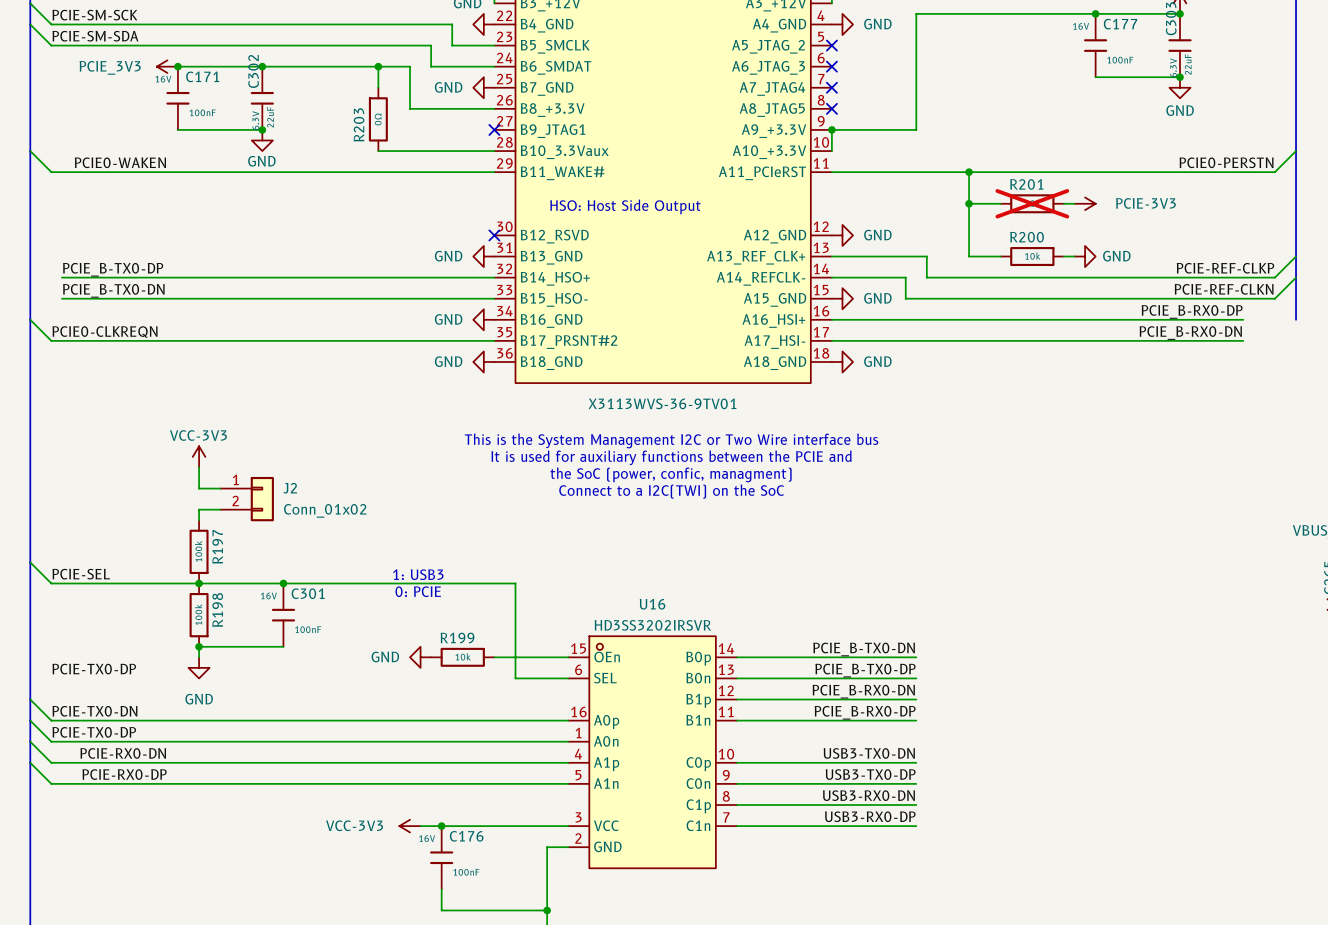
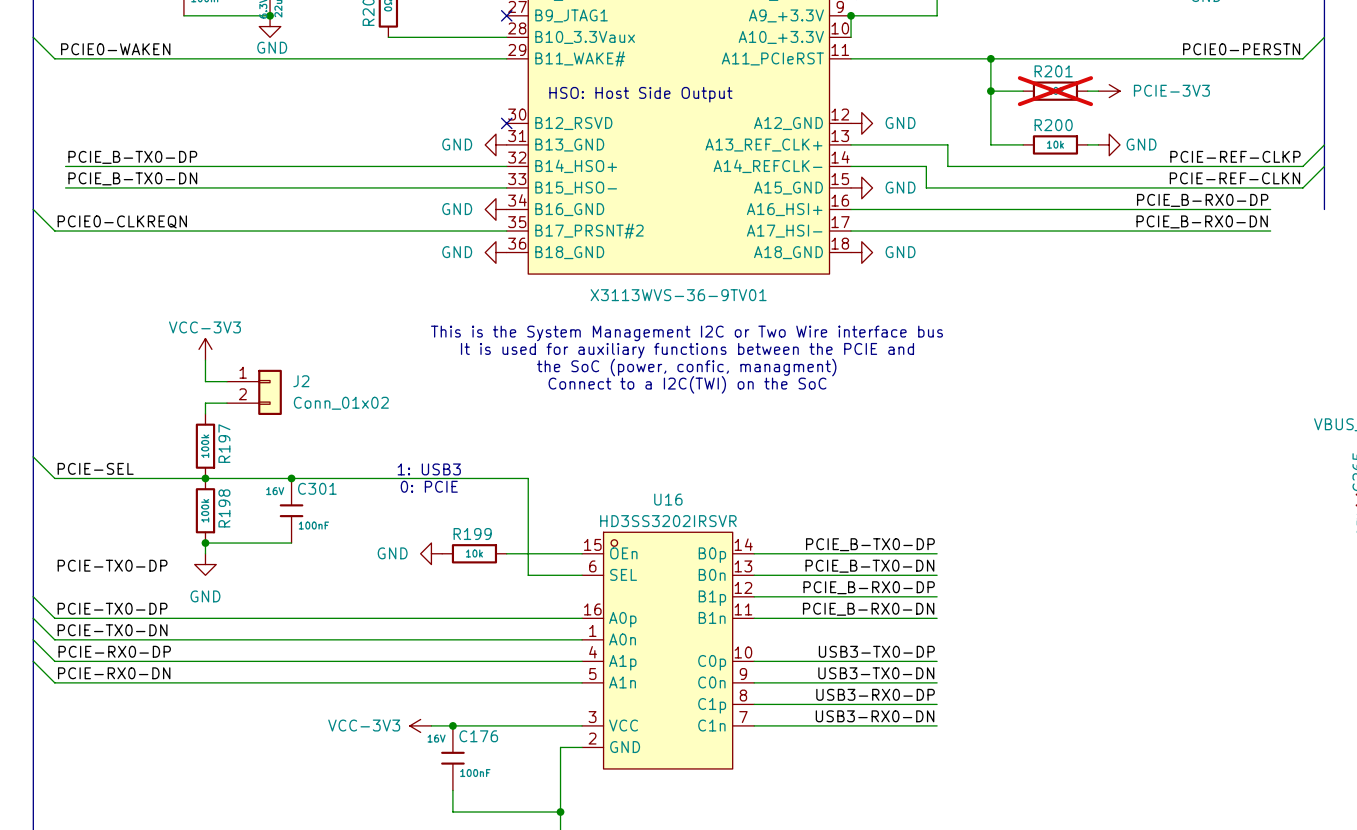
label: PCIE_B-TX0-DN (864, 649) -> PCIE_B-TX0-DP (870, 544)
label: PCIE_B-TX0-DP (865, 670) -> PCIE_B-TX0-DN (869, 566)
label: PCIE_B-RX0-DN (863, 691) -> PCIE_B-RX0-DP (869, 587)
label: PCIE-TX0-DN (94, 711) -> PCIE-TX0-DP (112, 608)
label: PCIE_B-RX0-DP (865, 712) -> PCIE_B-RX0-DN (868, 609)
label: PCIE-TX0-DP (94, 732) -> PCIE-TX0-DN (112, 630)
label: PCIE-RX0-DN (123, 753) -> PCIE-RX0-DP (114, 651)
label: USB3-TX0-DN (869, 753) -> USB3-TX0-DP (876, 651)
label: PCIE-RX0-DP (124, 774) -> PCIE-RX0-DN (114, 673)
label: USB3-TX0-DP (870, 774) -> USB3-TX0-DN (876, 673)
label: USB3-RX0-DN (868, 795) -> USB3-RX0-DP (875, 694)
label: USB3-RX0-DP (870, 816) -> USB3-RX0-DN (875, 716)

